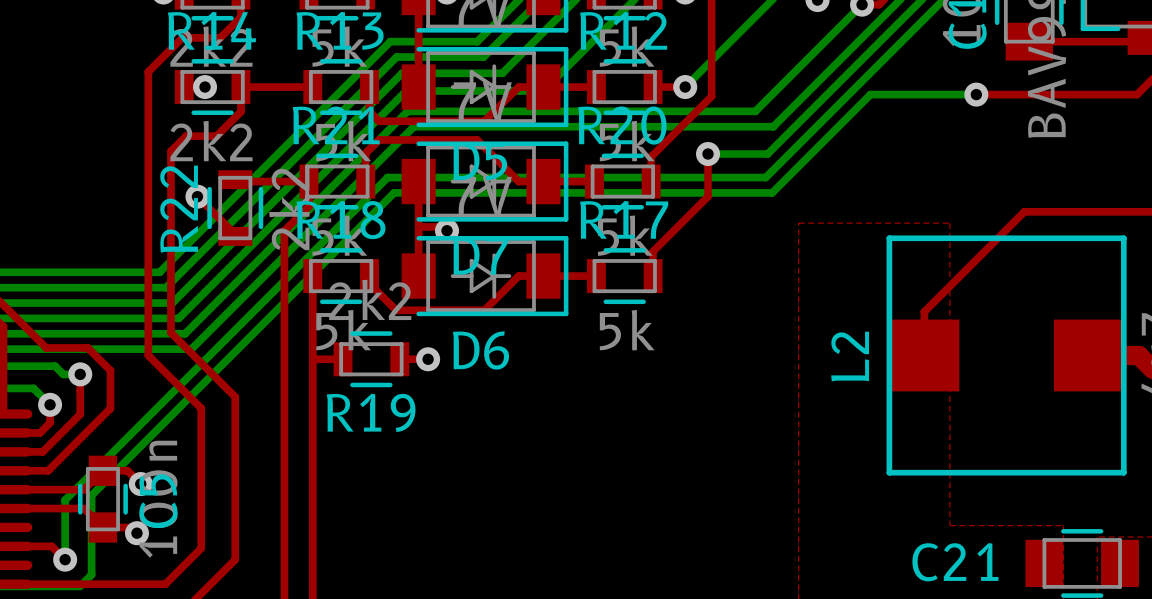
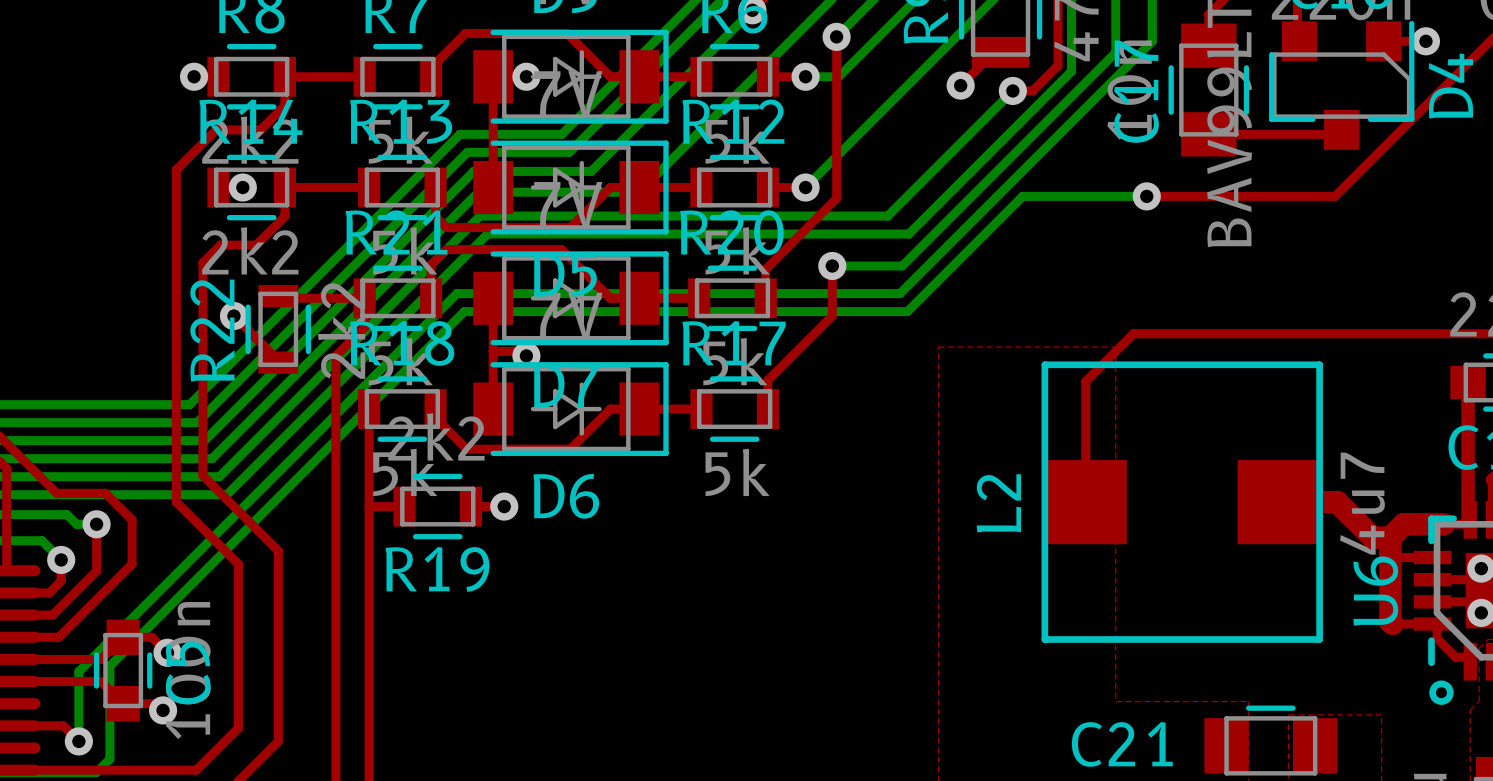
top track: (1024, 211) (924, 311) -> (1203, 333) (1133, 333) (1085, 381) (1085, 451)

